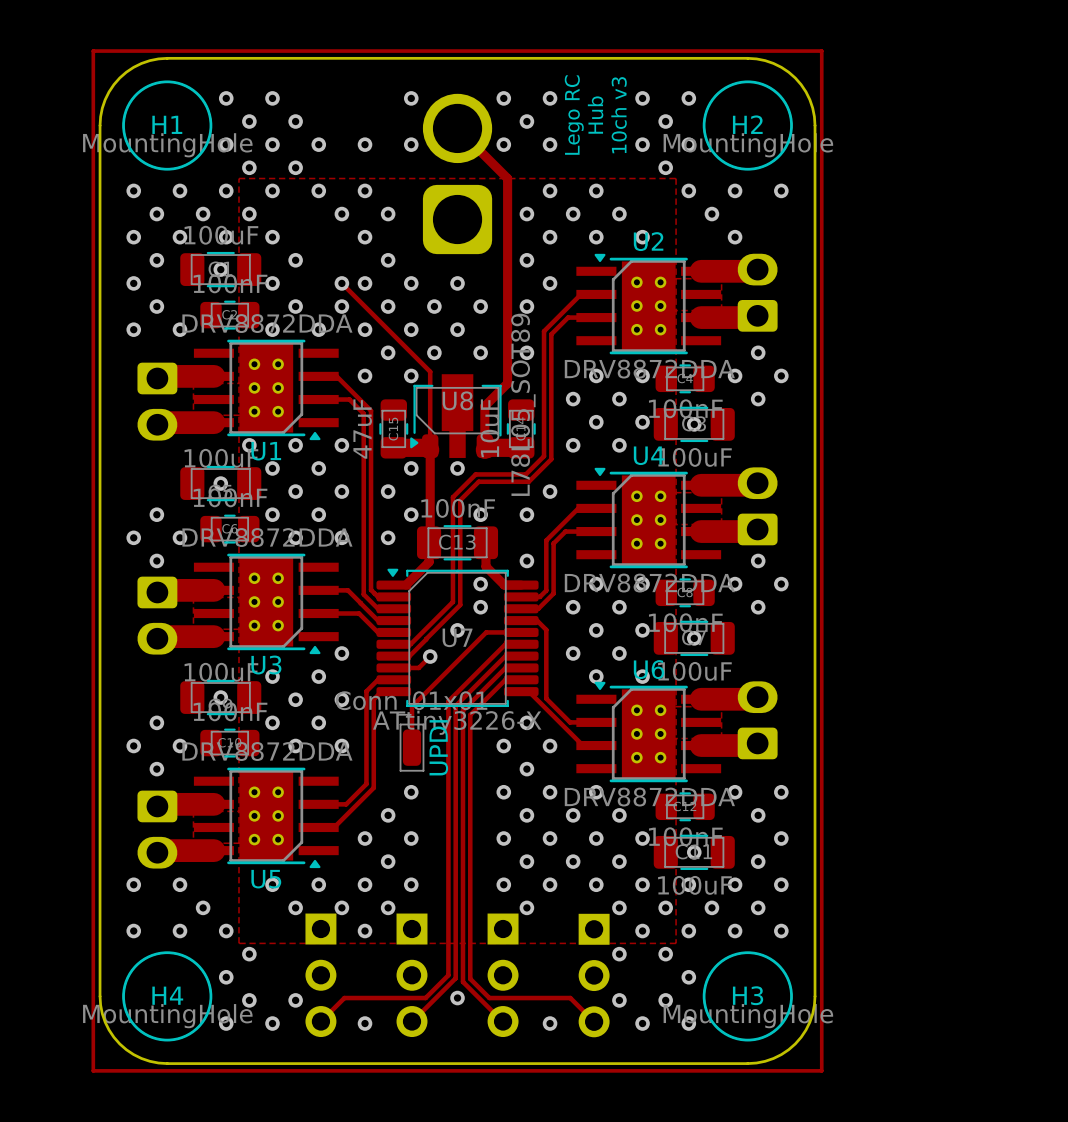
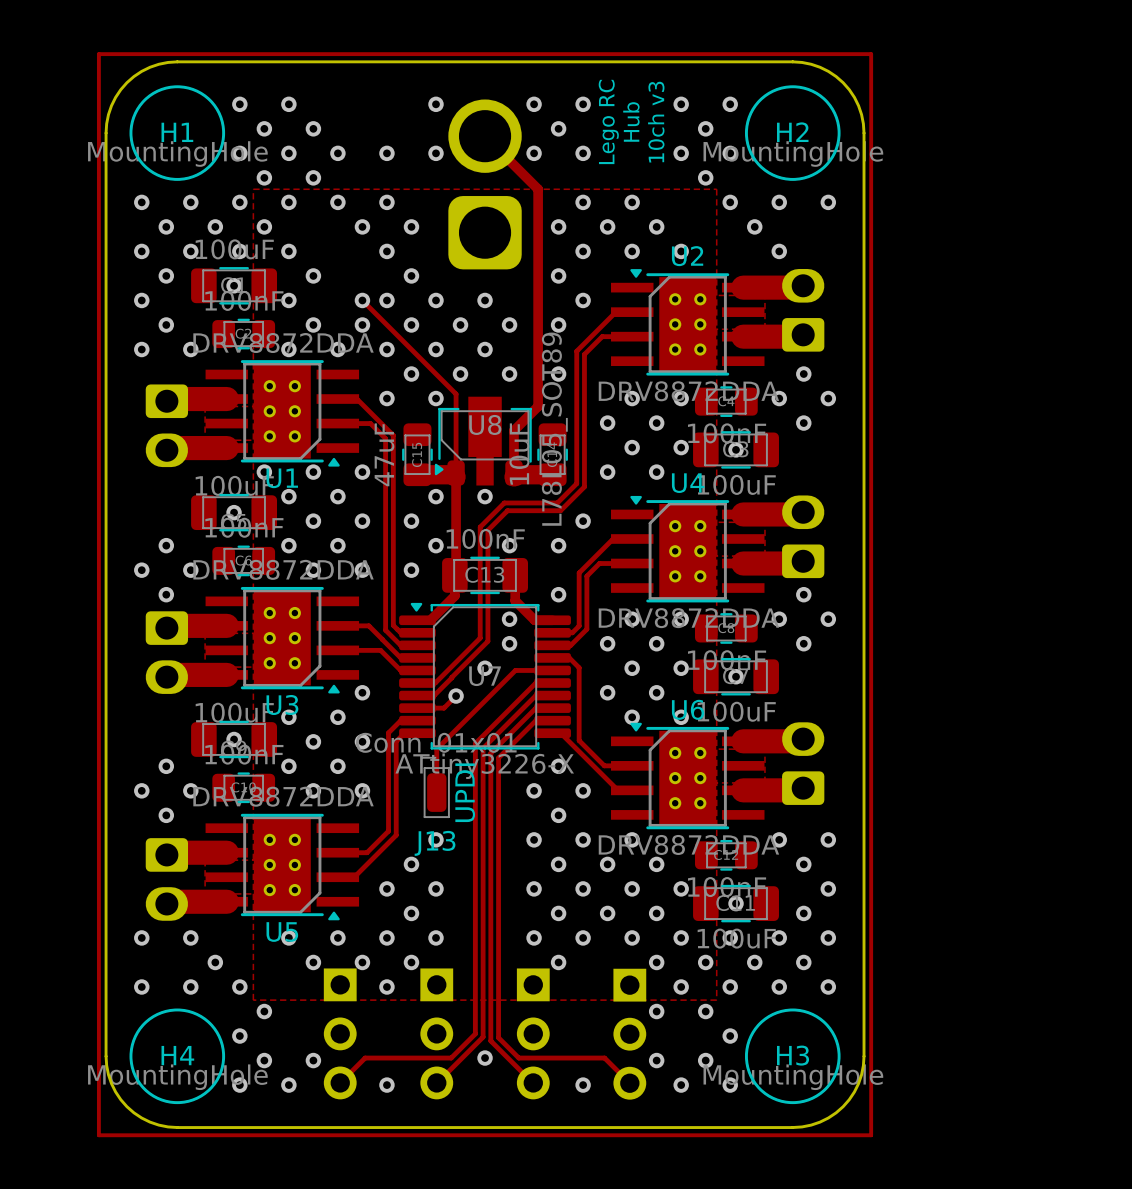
J13 name: none -> J13 (435, 843)

